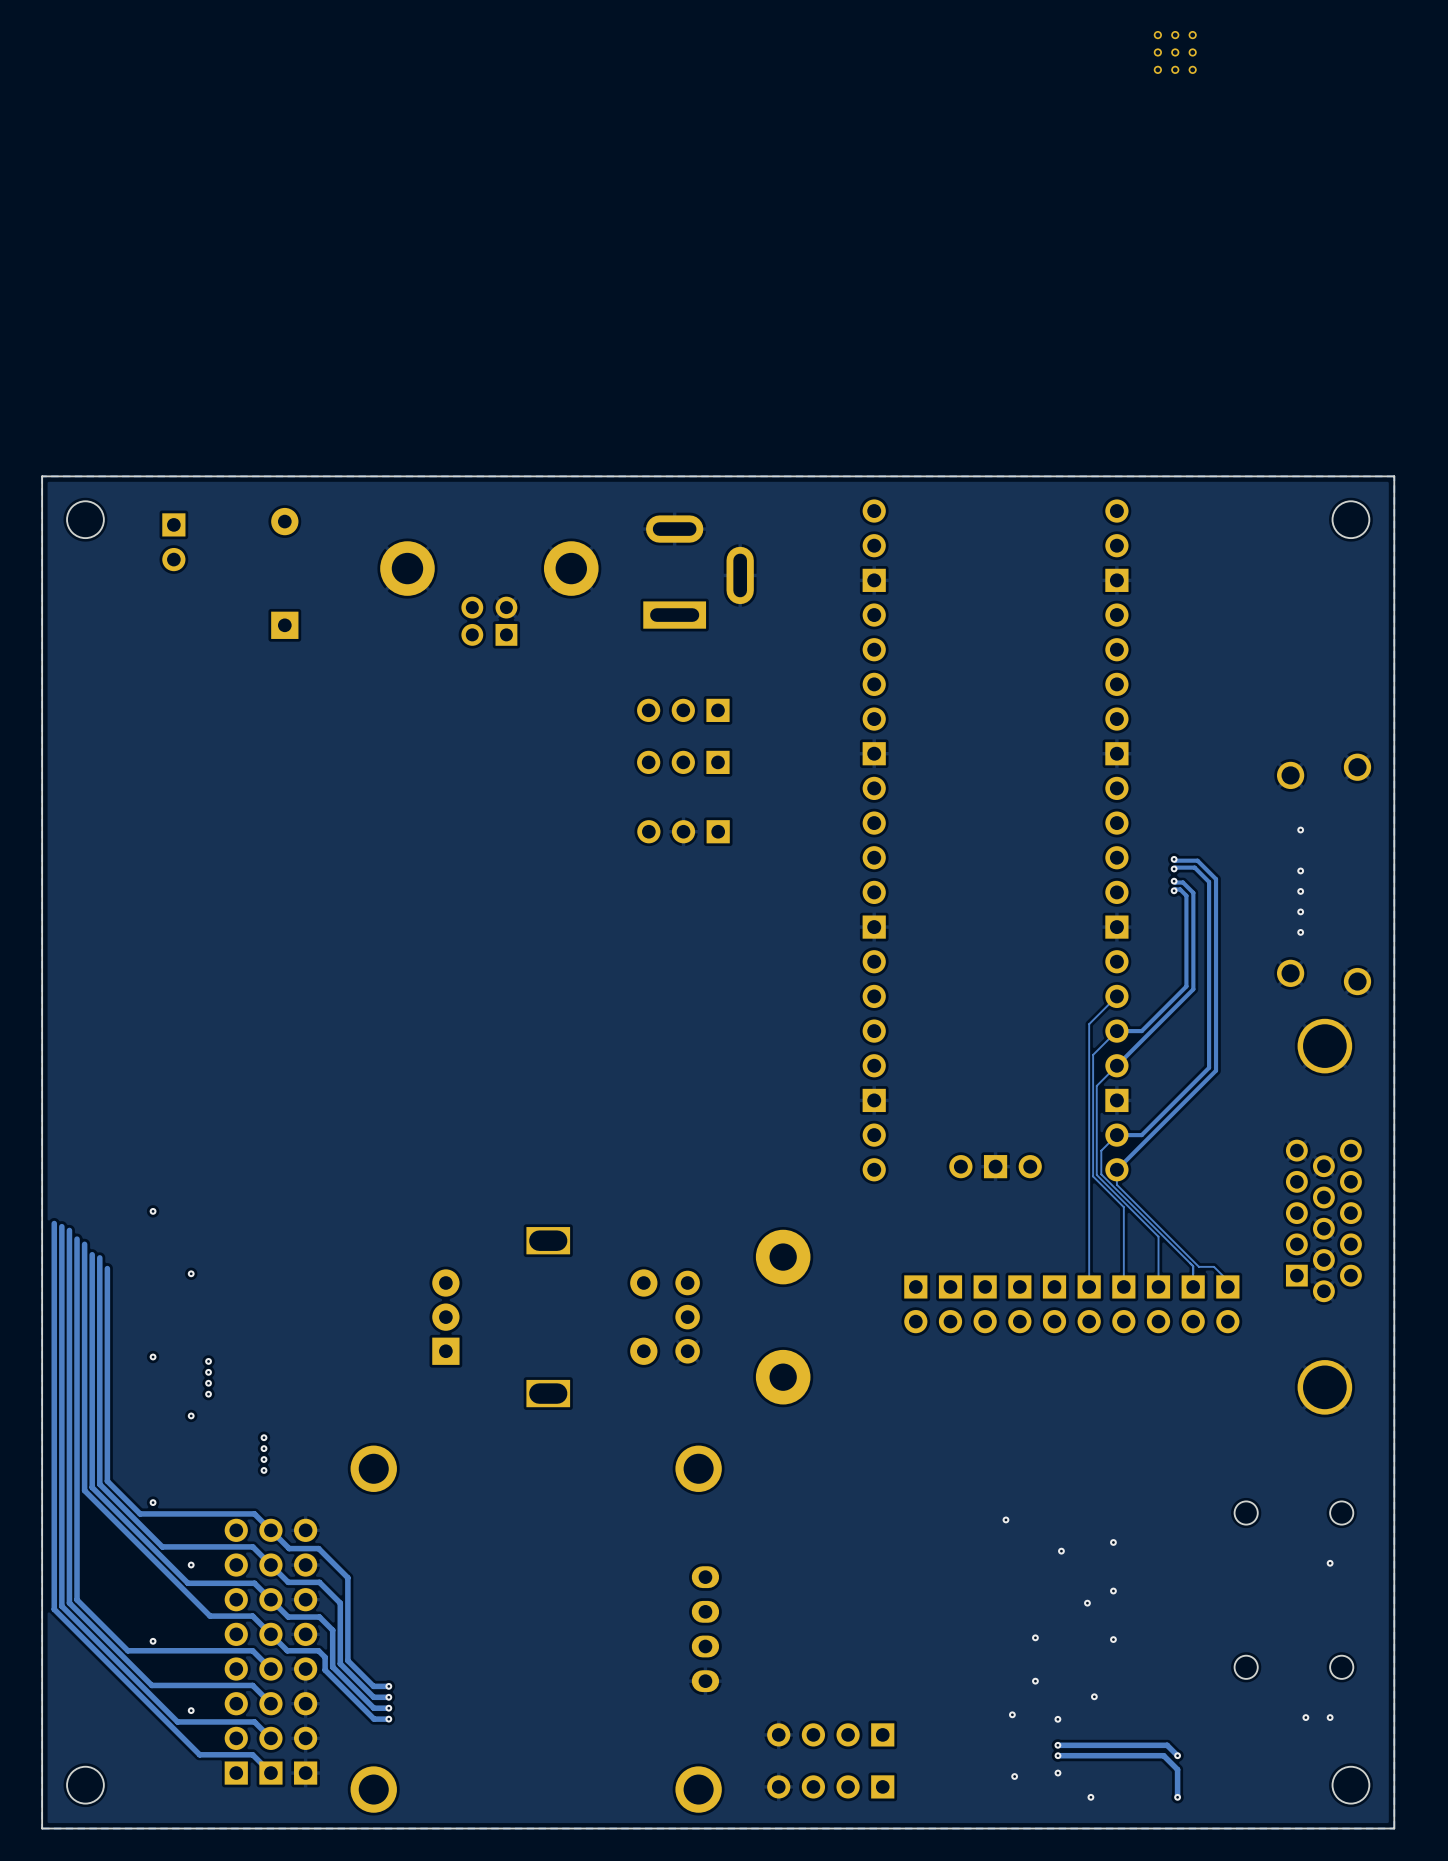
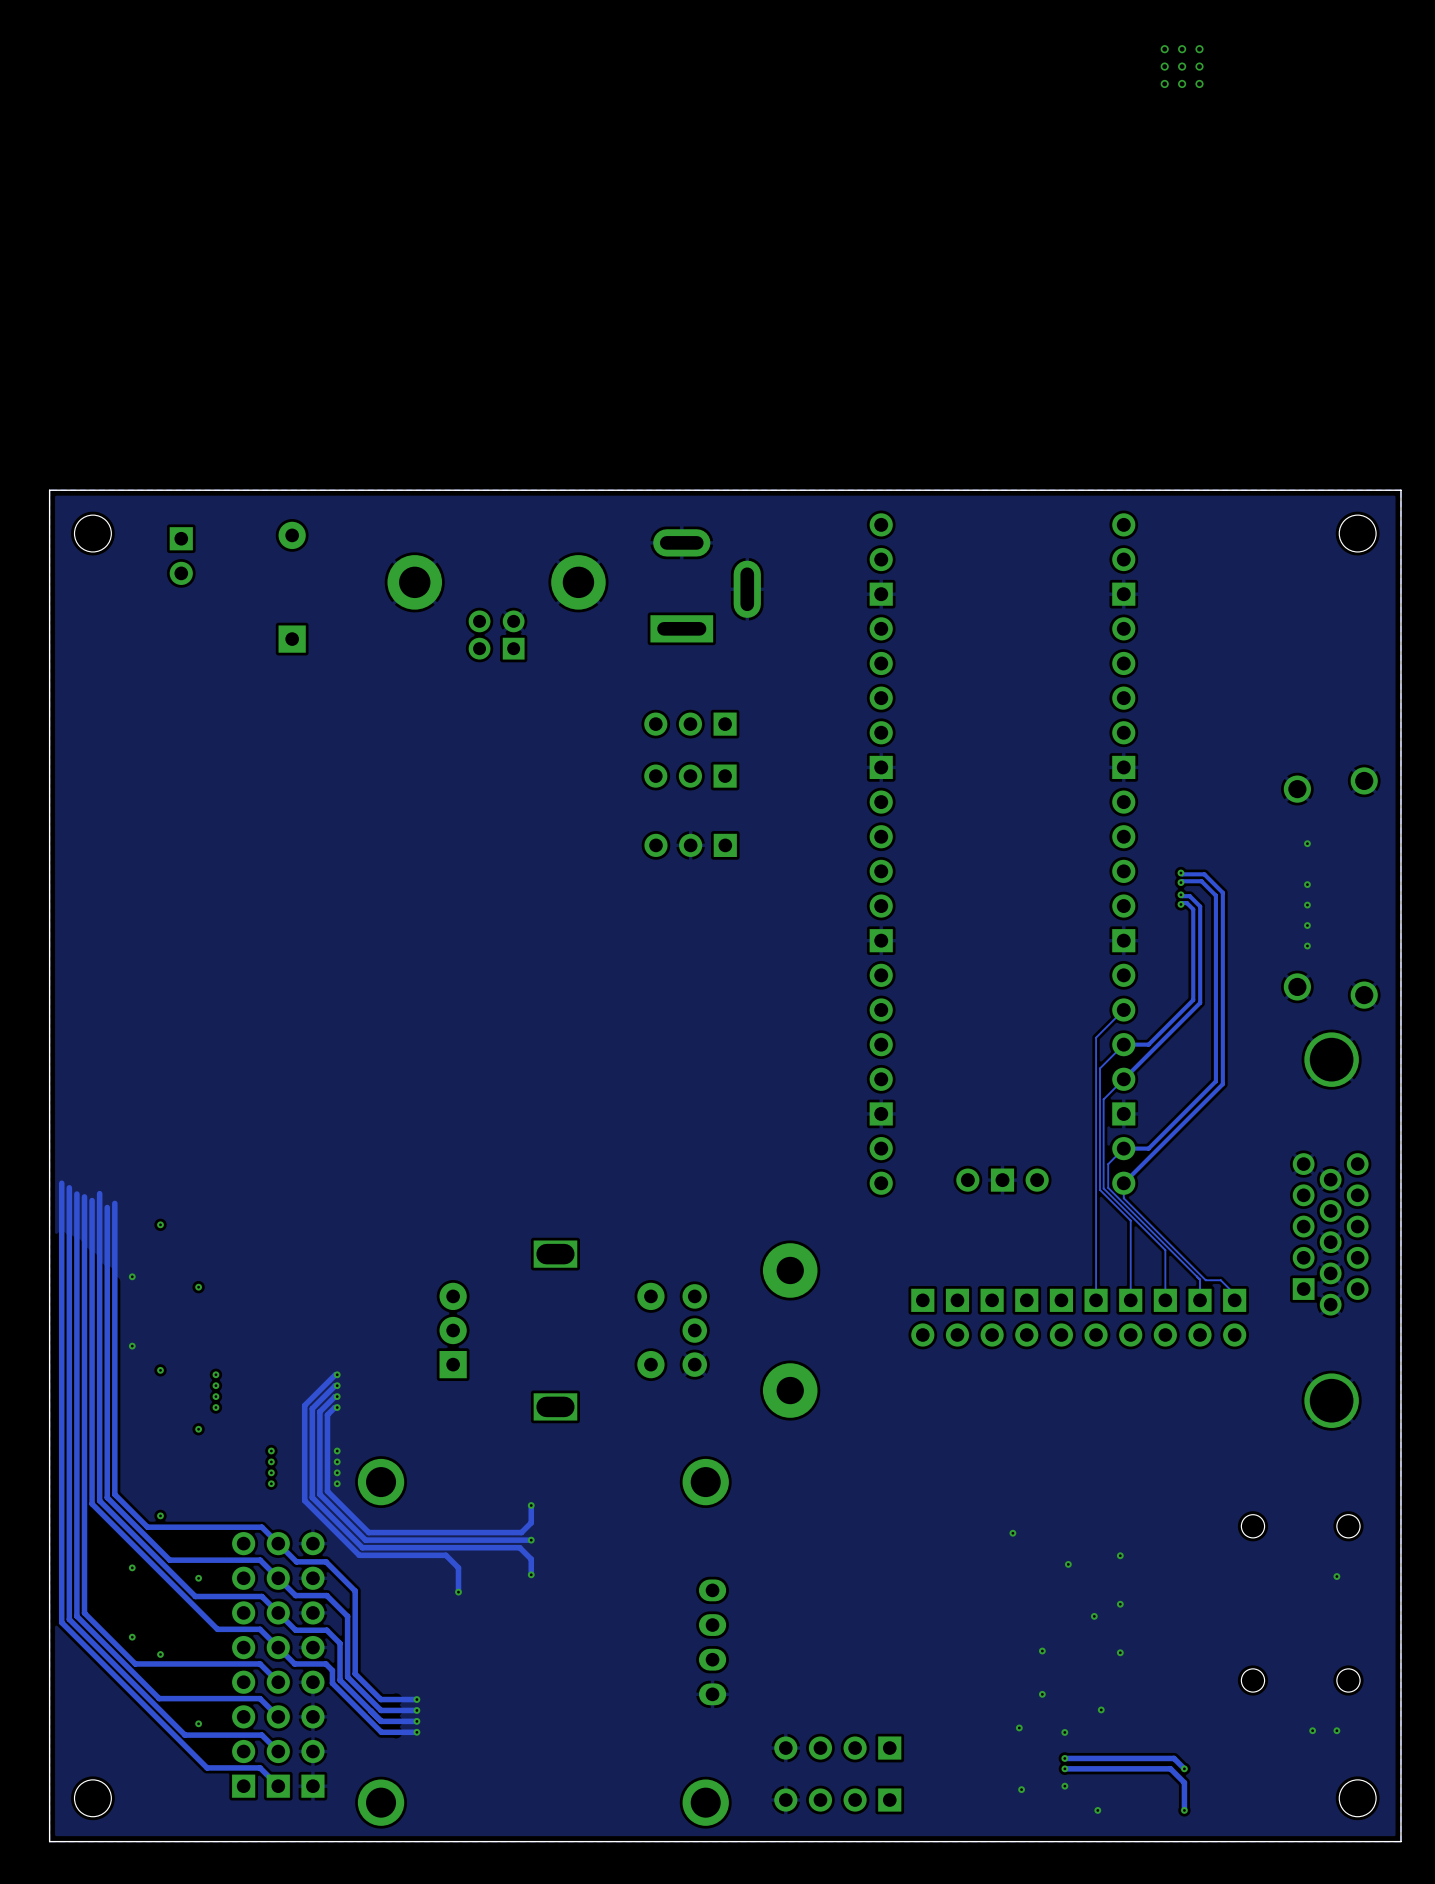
track: none -> (61, 1183) (61, 1236)
track: none -> (69, 1187) (69, 1240)
track: none -> (76, 1194) (76, 1243)
track: none -> (99, 1193) (99, 1268)
track: none -> (84, 1196) (84, 1252)
track: none -> (92, 1200) (92, 1257)
track: none -> (114, 1203) (114, 1282)
track: none -> (107, 1207) (107, 1271)
via: none -> (132, 1276)
via: none -> (132, 1346)
track: none -> (337, 1374) (304, 1405) (304, 1500) (359, 1555) (445, 1555) (458, 1567) (458, 1592)
via: none -> (337, 1374)
track: none -> (337, 1385) (312, 1408) (312, 1497) (362, 1547) (519, 1547) (531, 1559) (531, 1574)
via: none -> (337, 1385)
track: none -> (337, 1396) (319, 1411) (319, 1494) (365, 1540) (531, 1540)
via: none -> (337, 1396)
track: none -> (337, 1407) (327, 1414) (327, 1491) (368, 1532) (521, 1532) (531, 1522) (531, 1505)
via: none -> (337, 1407)
via: none -> (337, 1451)
via: none -> (337, 1461)
via: none -> (337, 1472)
via: none -> (337, 1483)
via: none -> (531, 1505)
via: none -> (531, 1540)
via: none -> (132, 1567)
via: none -> (531, 1574)
via: none -> (458, 1592)
via: none -> (132, 1637)
via: (388, 1686) -> none
track: none -> (416, 1699) (396, 1699)
via: none -> (416, 1699)
via: (388, 1697) -> none
track: none -> (416, 1710) (396, 1710)
via: none -> (416, 1710)
via: (388, 1708) -> none
track: none -> (416, 1721) (396, 1721)
via: none -> (416, 1721)
via: (388, 1719) -> none
track: none -> (416, 1732) (396, 1732)
via: none -> (416, 1732)

